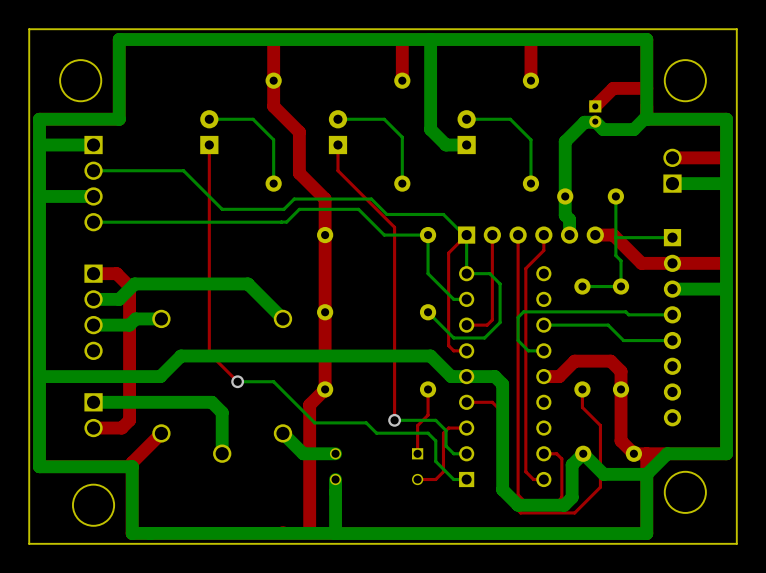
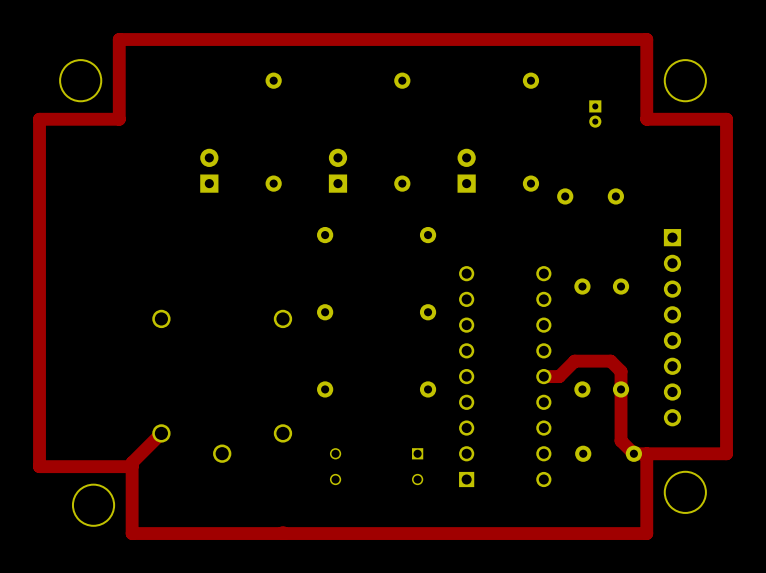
board edge: (736, 29) (29, 29) (29, 543) (736, 543) (736, 29) -> none
top track: (273, 39) (273, 106) (299, 132) (299, 173) (325, 199) (325, 391) -> none
top track: (402, 39) (402, 80) -> none
bottom track: (430, 39) (430, 129) (446, 145) (466, 145) -> none
top track: (530, 39) (530, 80) -> none
top track: (646, 88) (613, 88) (595, 105) -> none
bottom track: (209, 119) (253, 119) (273, 139) (273, 183) -> none
bottom track: (337, 119) (384, 119) (402, 137) (402, 183) -> none
bottom track: (466, 119) (510, 119) (530, 139) (530, 183) -> none
bottom track: (646, 119) (646, 39) (119, 39) (119, 119) (39, 119) (39, 466) -> none
part position: (209, 132) -> (209, 170)
part position: (337, 132) -> (337, 170)
part position: (466, 132) -> (466, 170)
bottom track: (93, 145) (39, 145) -> none
top track: (209, 145) (209, 353) (237, 381) -> none
top track: (337, 145) (337, 170) (394, 227) (394, 420) -> none
top track: (726, 157) (672, 157) -> none
bottom track: (93, 170) (183, 170) (222, 209) (283, 209) (294, 199) (371, 199) (386, 214) (443, 214) (466, 237) (466, 273) (489, 273) (500, 283) (500, 322) (484, 337) (453, 337) (428, 312) -> none
part: (672, 170) -> none
part: (93, 183) -> none
bottom track: (726, 183) (672, 183) -> none
bottom track: (93, 196) (39, 196) -> none
bottom track: (615, 196) (615, 255) (621, 260) (621, 286) (582, 286) -> none
bottom track: (281, 222) (286, 222) (299, 209) (358, 209) (384, 235) (428, 235) (428, 273) (453, 299) (466, 299) -> none
bottom track: (281, 222) (93, 222) -> none
top track: (466, 235) (448, 253) (448, 345) (453, 350) (466, 350) -> none
top track: (492, 235) (492, 319) (487, 325) (466, 325) -> none
top track: (518, 235) (518, 494) (528, 505) (556, 505) (561, 497) (561, 458) (556, 453) (543, 453) -> none
part: (530, 235) -> none
top track: (543, 235) (543, 250) (525, 268) (525, 471) (533, 479) (543, 479) -> none
bottom track: (569, 235) (569, 219) (565, 215) (565, 141) (584, 122) (595, 122) (603, 129) (633, 129) (644, 119) (726, 119) (726, 453) (667, 453) (646, 474) -> none
top track: (595, 235) (613, 235) (641, 263) (726, 263) -> none
bottom track: (672, 237) (615, 237) -> none
top track: (93, 273) (116, 273) (129, 286) (129, 420) (121, 428) (93, 428) -> none
bottom track: (726, 289) (672, 289) -> none
bottom track: (93, 299) (119, 299) (134, 283) (247, 283) (282, 318) -> none
part: (93, 312) -> none
bottom track: (672, 314) (628, 314) (625, 311) (523, 311) (518, 317) (518, 340) (528, 350) (543, 350) -> none
bottom track: (161, 318) (135, 318) (129, 325) (93, 325) -> none
bottom track: (543, 325) (608, 325) (623, 340) (672, 340) -> none
bottom track: (39, 374) (42, 376) (160, 376) (181, 356) (430, 356) (451, 376) (494, 376) (502, 384) (502, 489) (518, 505) (564, 505) (572, 497) (572, 464) (583, 453) (603, 474) (646, 474) -> none
bottom track: (237, 381) (273, 381) (314, 422) (366, 422) (376, 433) (428, 433) (435, 440) (435, 461) (453, 479) (466, 479) -> none
via: (237, 381) -> none
top track: (325, 389) (309, 404) (309, 533) -> none
top track: (428, 389) (428, 415) (417, 425) (417, 453) -> none
top track: (582, 389) (582, 407) (600, 425) (600, 487) (574, 512) (520, 512) (502, 494) (502, 412) (492, 402) (466, 402) -> none
bottom track: (93, 402) (211, 402) (222, 412) (222, 453) -> none
part: (93, 415) -> none
bottom track: (394, 420) (435, 420) (446, 430) (446, 446) (453, 453) (466, 453) -> none
via: (394, 420) -> none
top track: (466, 428) (448, 428) (443, 433) (443, 471) (435, 479) (417, 479) -> none
bottom track: (282, 433) (303, 453) (335, 453) -> none
bottom track: (39, 466) (132, 466) (132, 533) (335, 533) (335, 479) -> none
bottom track: (646, 474) (646, 533) (335, 533) -> none

